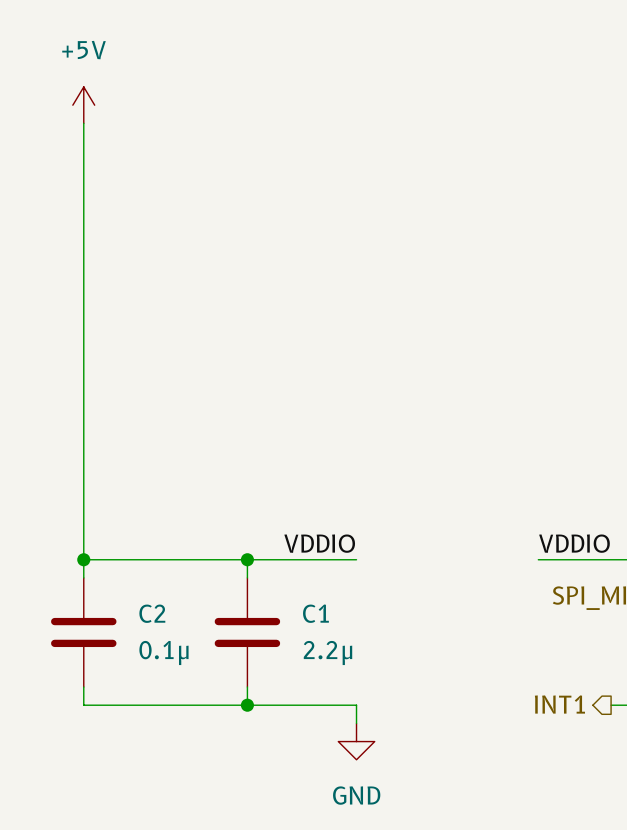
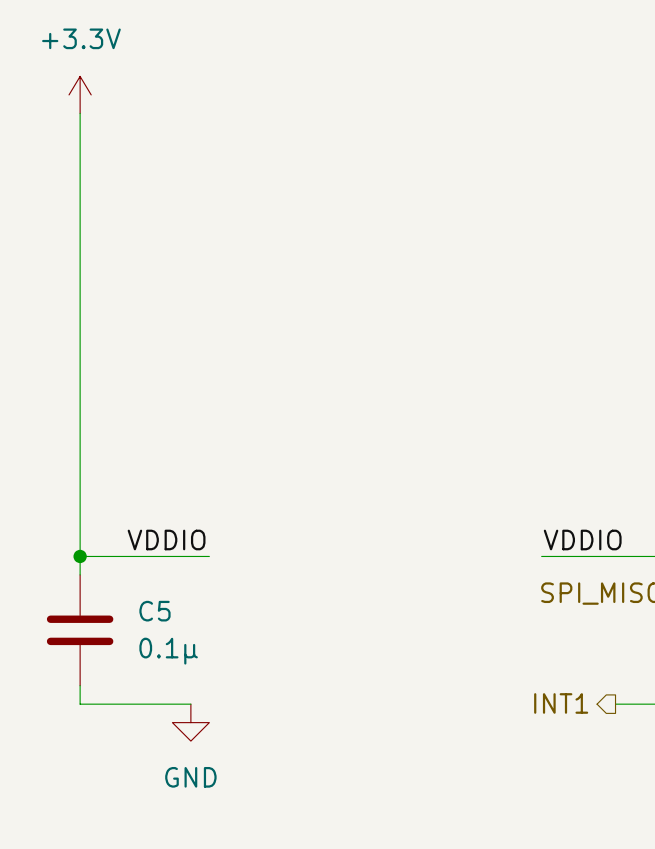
power symbol: +5V (83, 105) -> +3.3V (80, 94)
label position: VDDIO (319, 543) -> VDDIO (166, 539)
wire: (211, 559) (356, 559) -> none
wire: (247, 559) (247, 577) -> none
junction: (247, 559) -> none
C2 name: C2 (152, 613) -> C5 (154, 611)
C1: 2.2μ (247, 632) -> none
wire: (247, 687) (247, 705) -> none
wire: (192, 705) (356, 705) (356, 723) -> none
junction: (247, 705) -> none
power symbol position: GND (356, 741) -> GND (190, 722)

